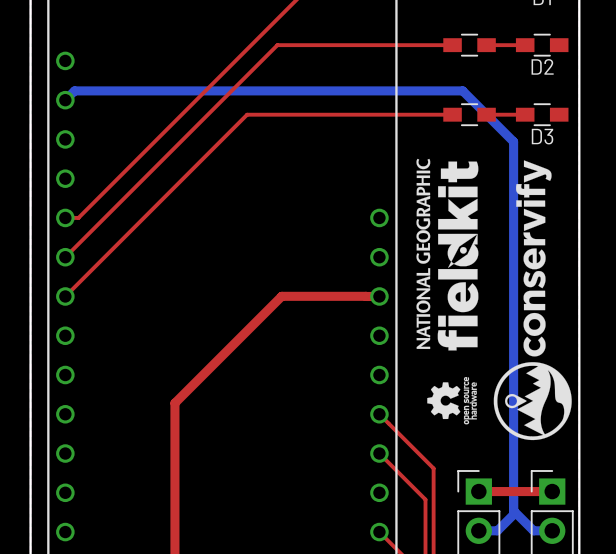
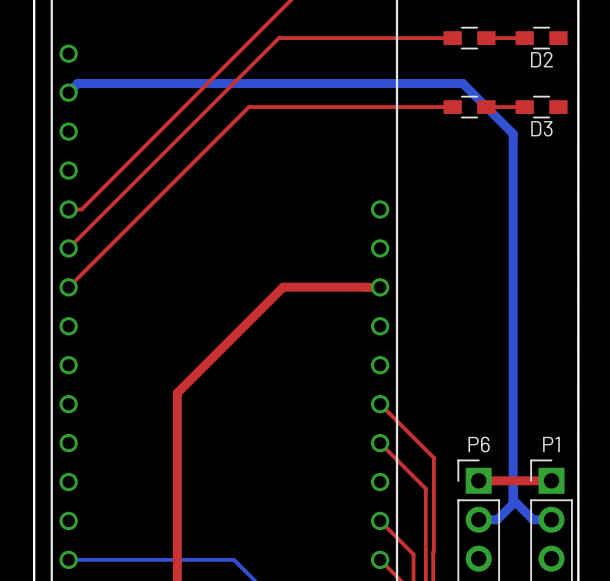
drawing: [416, 158, 572, 441] -> none
P6 name: none -> P6 (479, 444)
P1 name: none -> P1 (551, 444)

